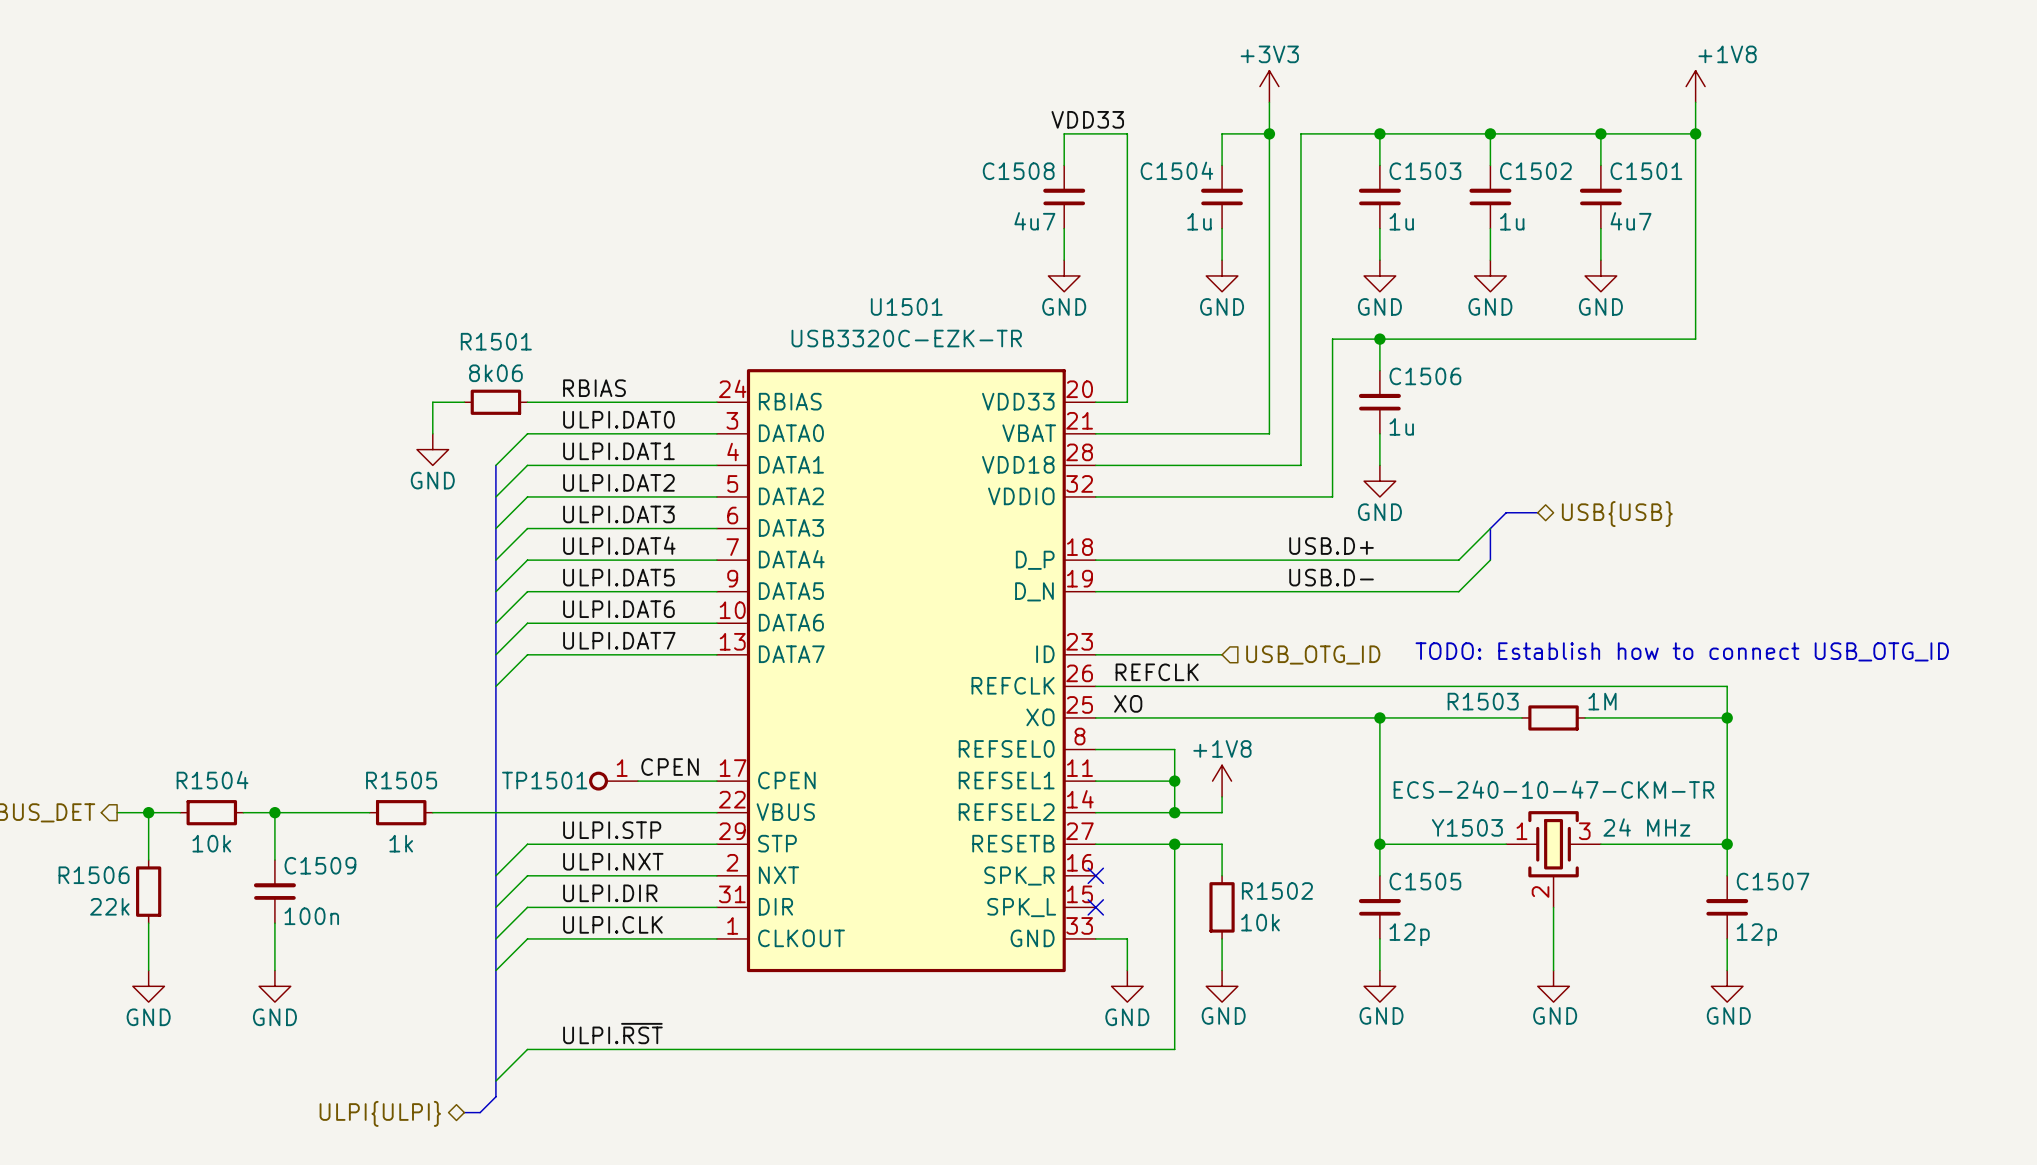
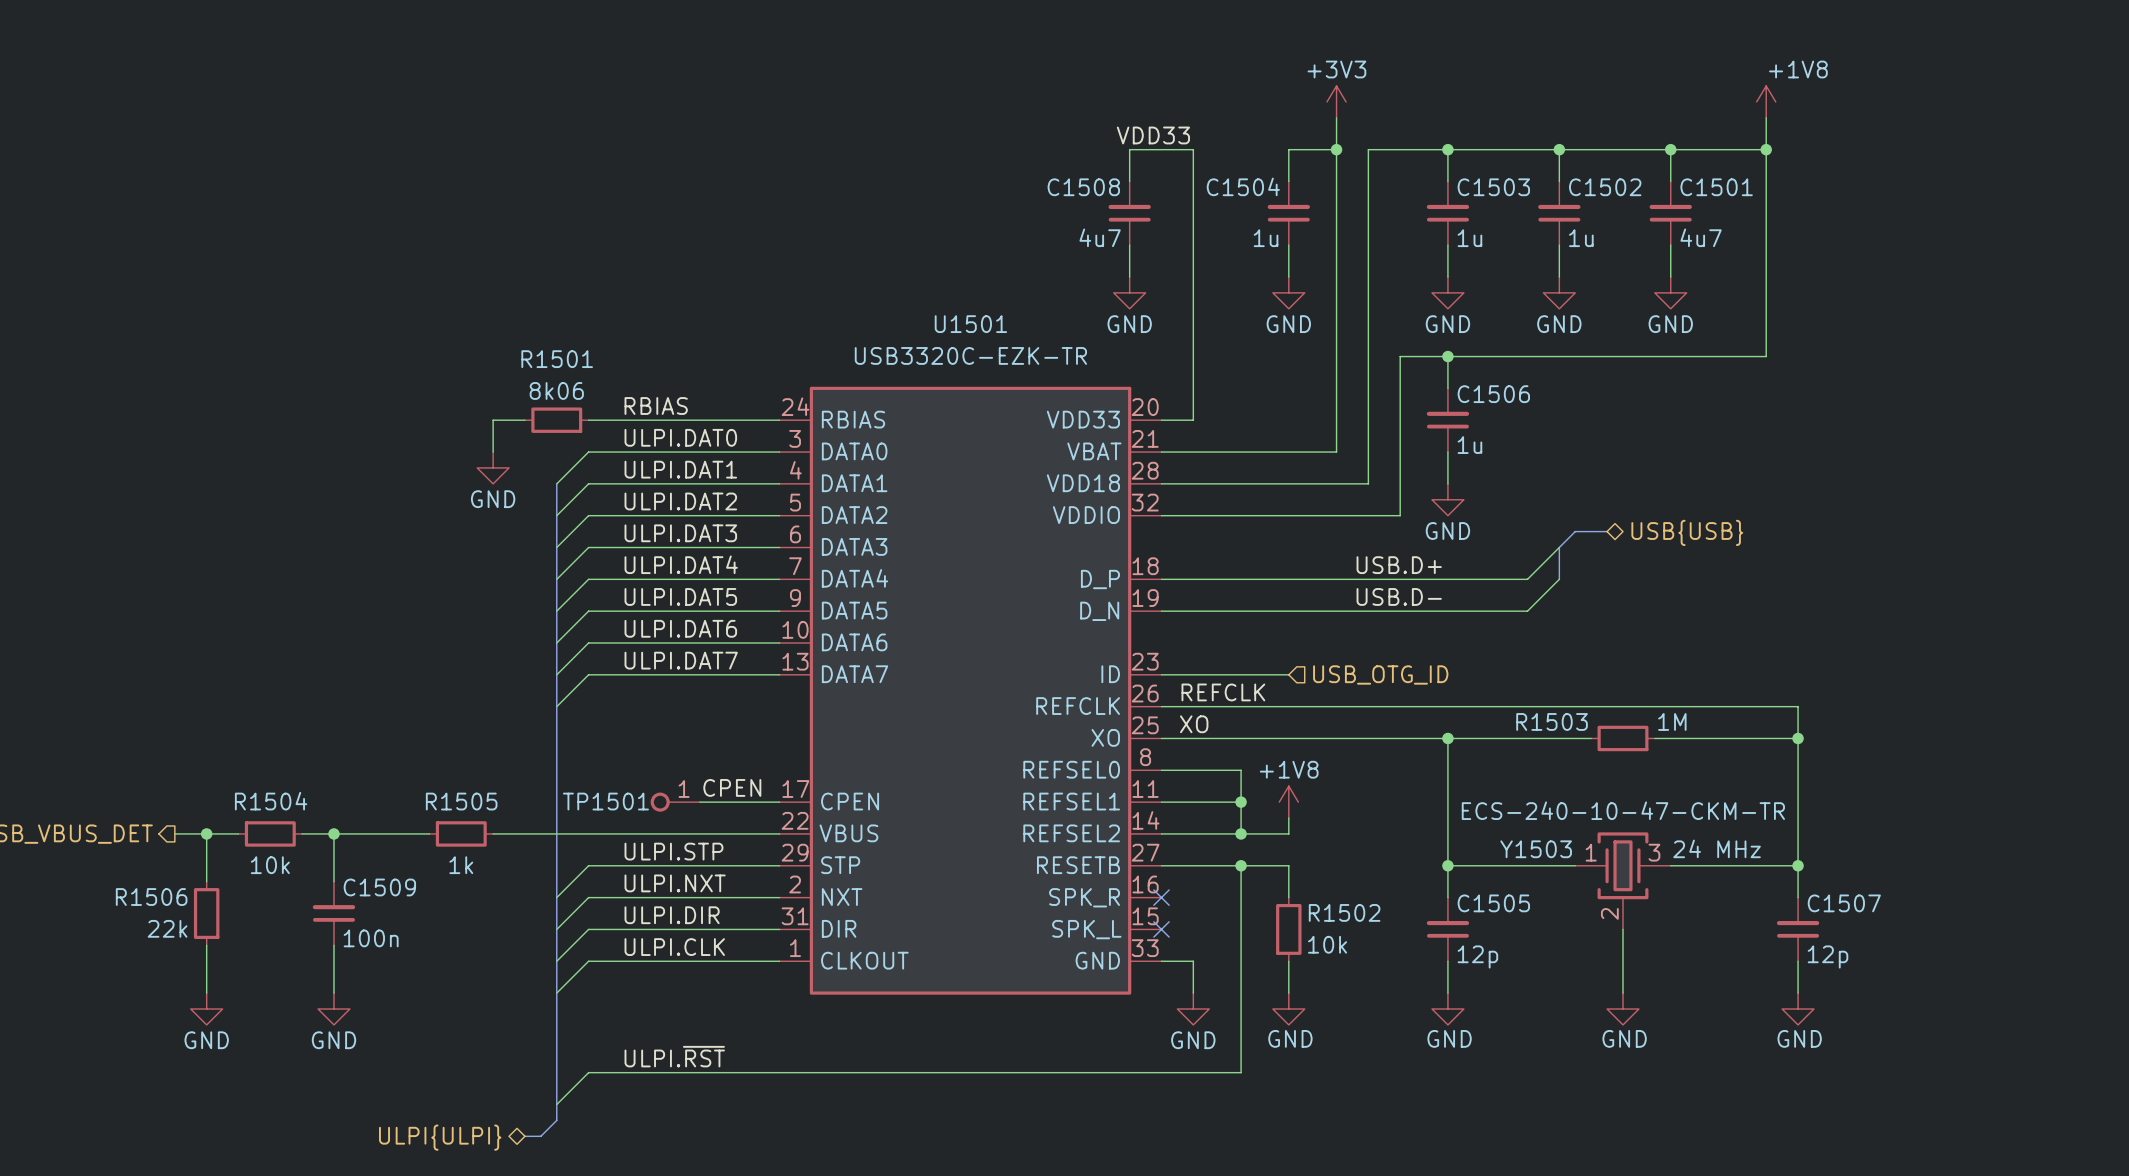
text: TODO: Establish how to connect USB_OTG_ID (1682, 651) -> none

